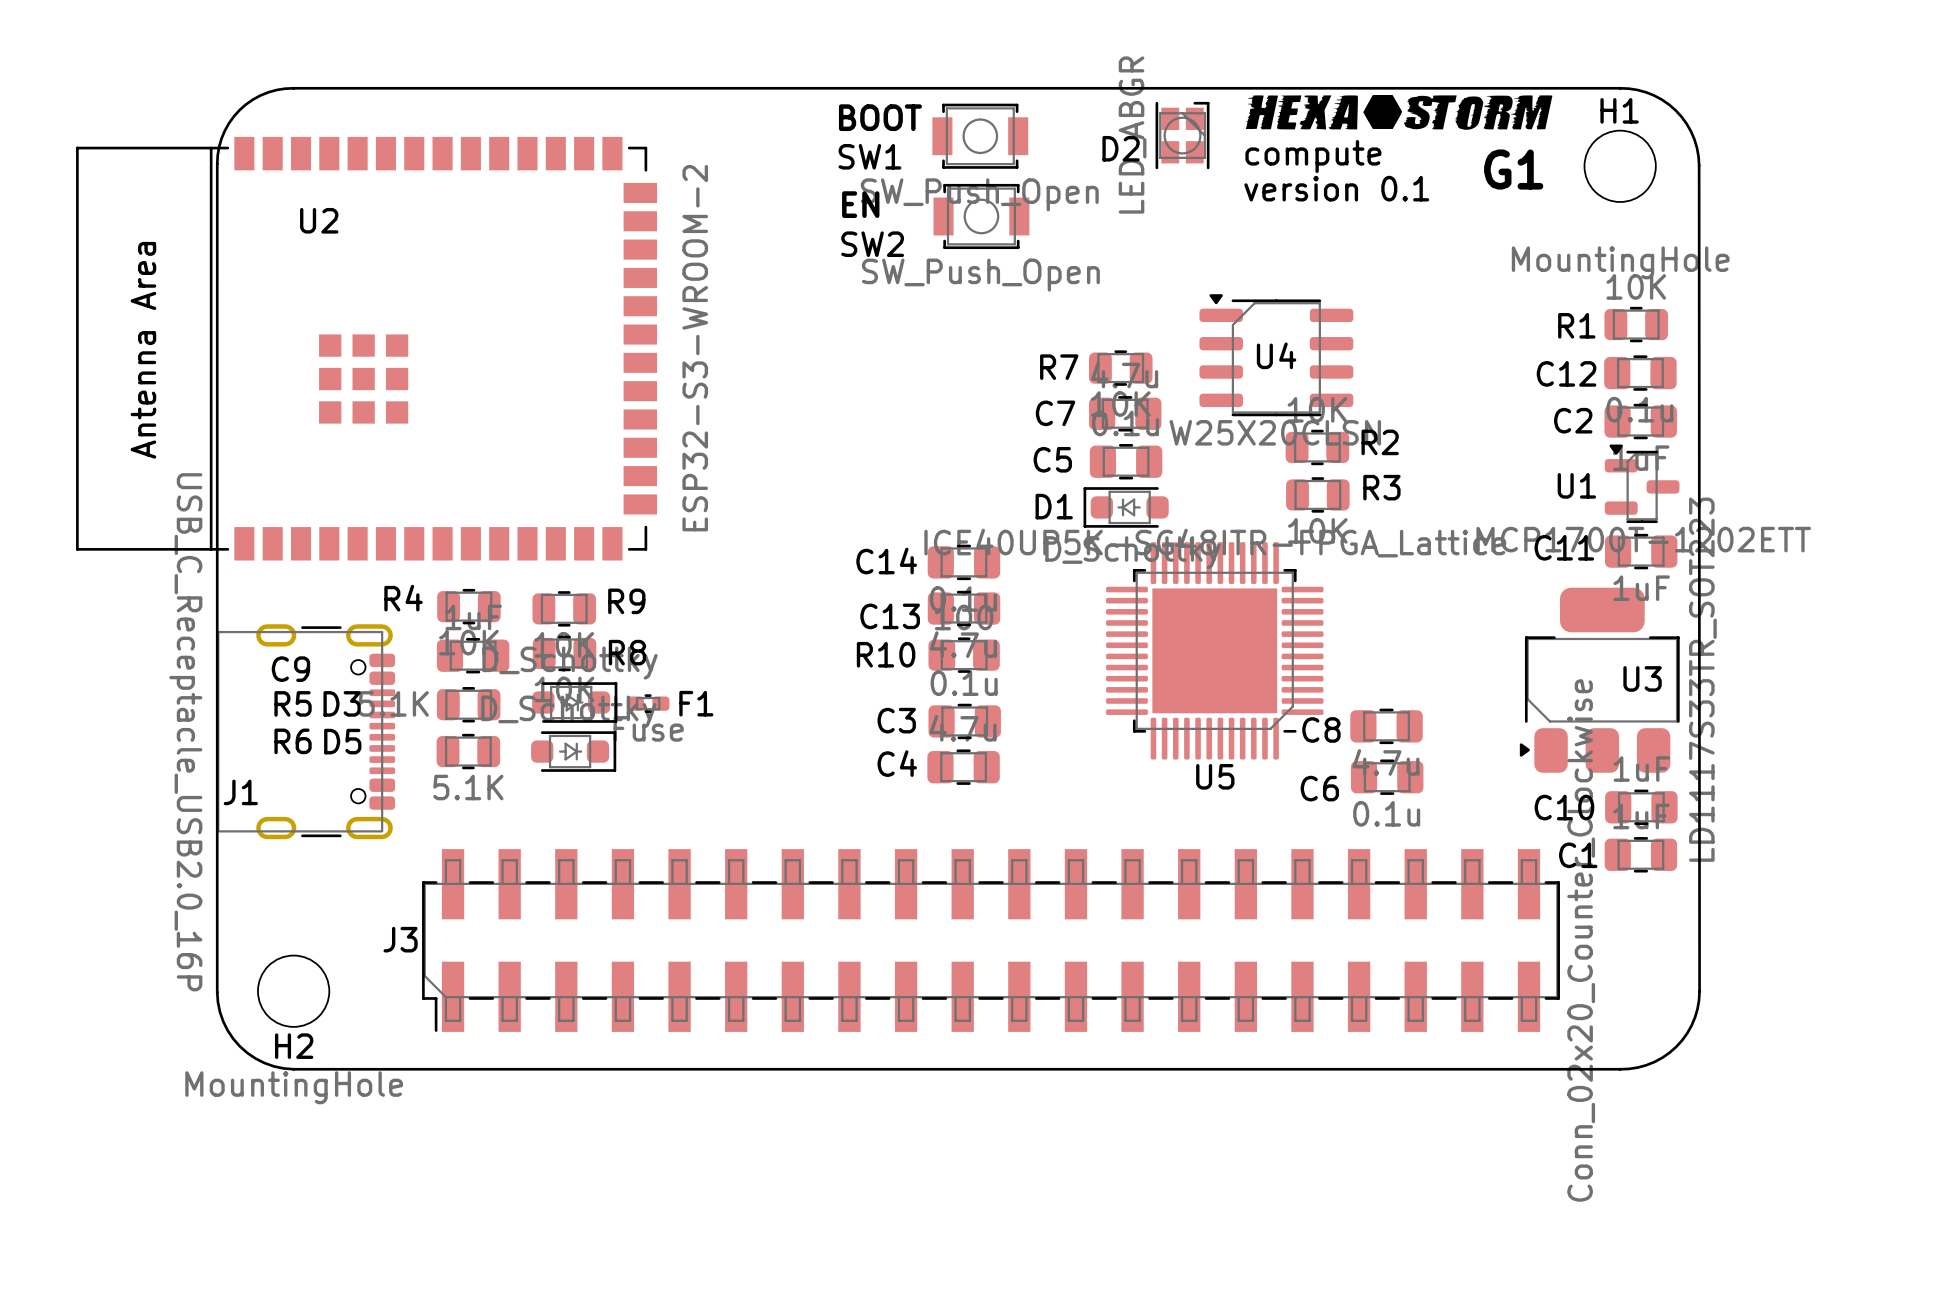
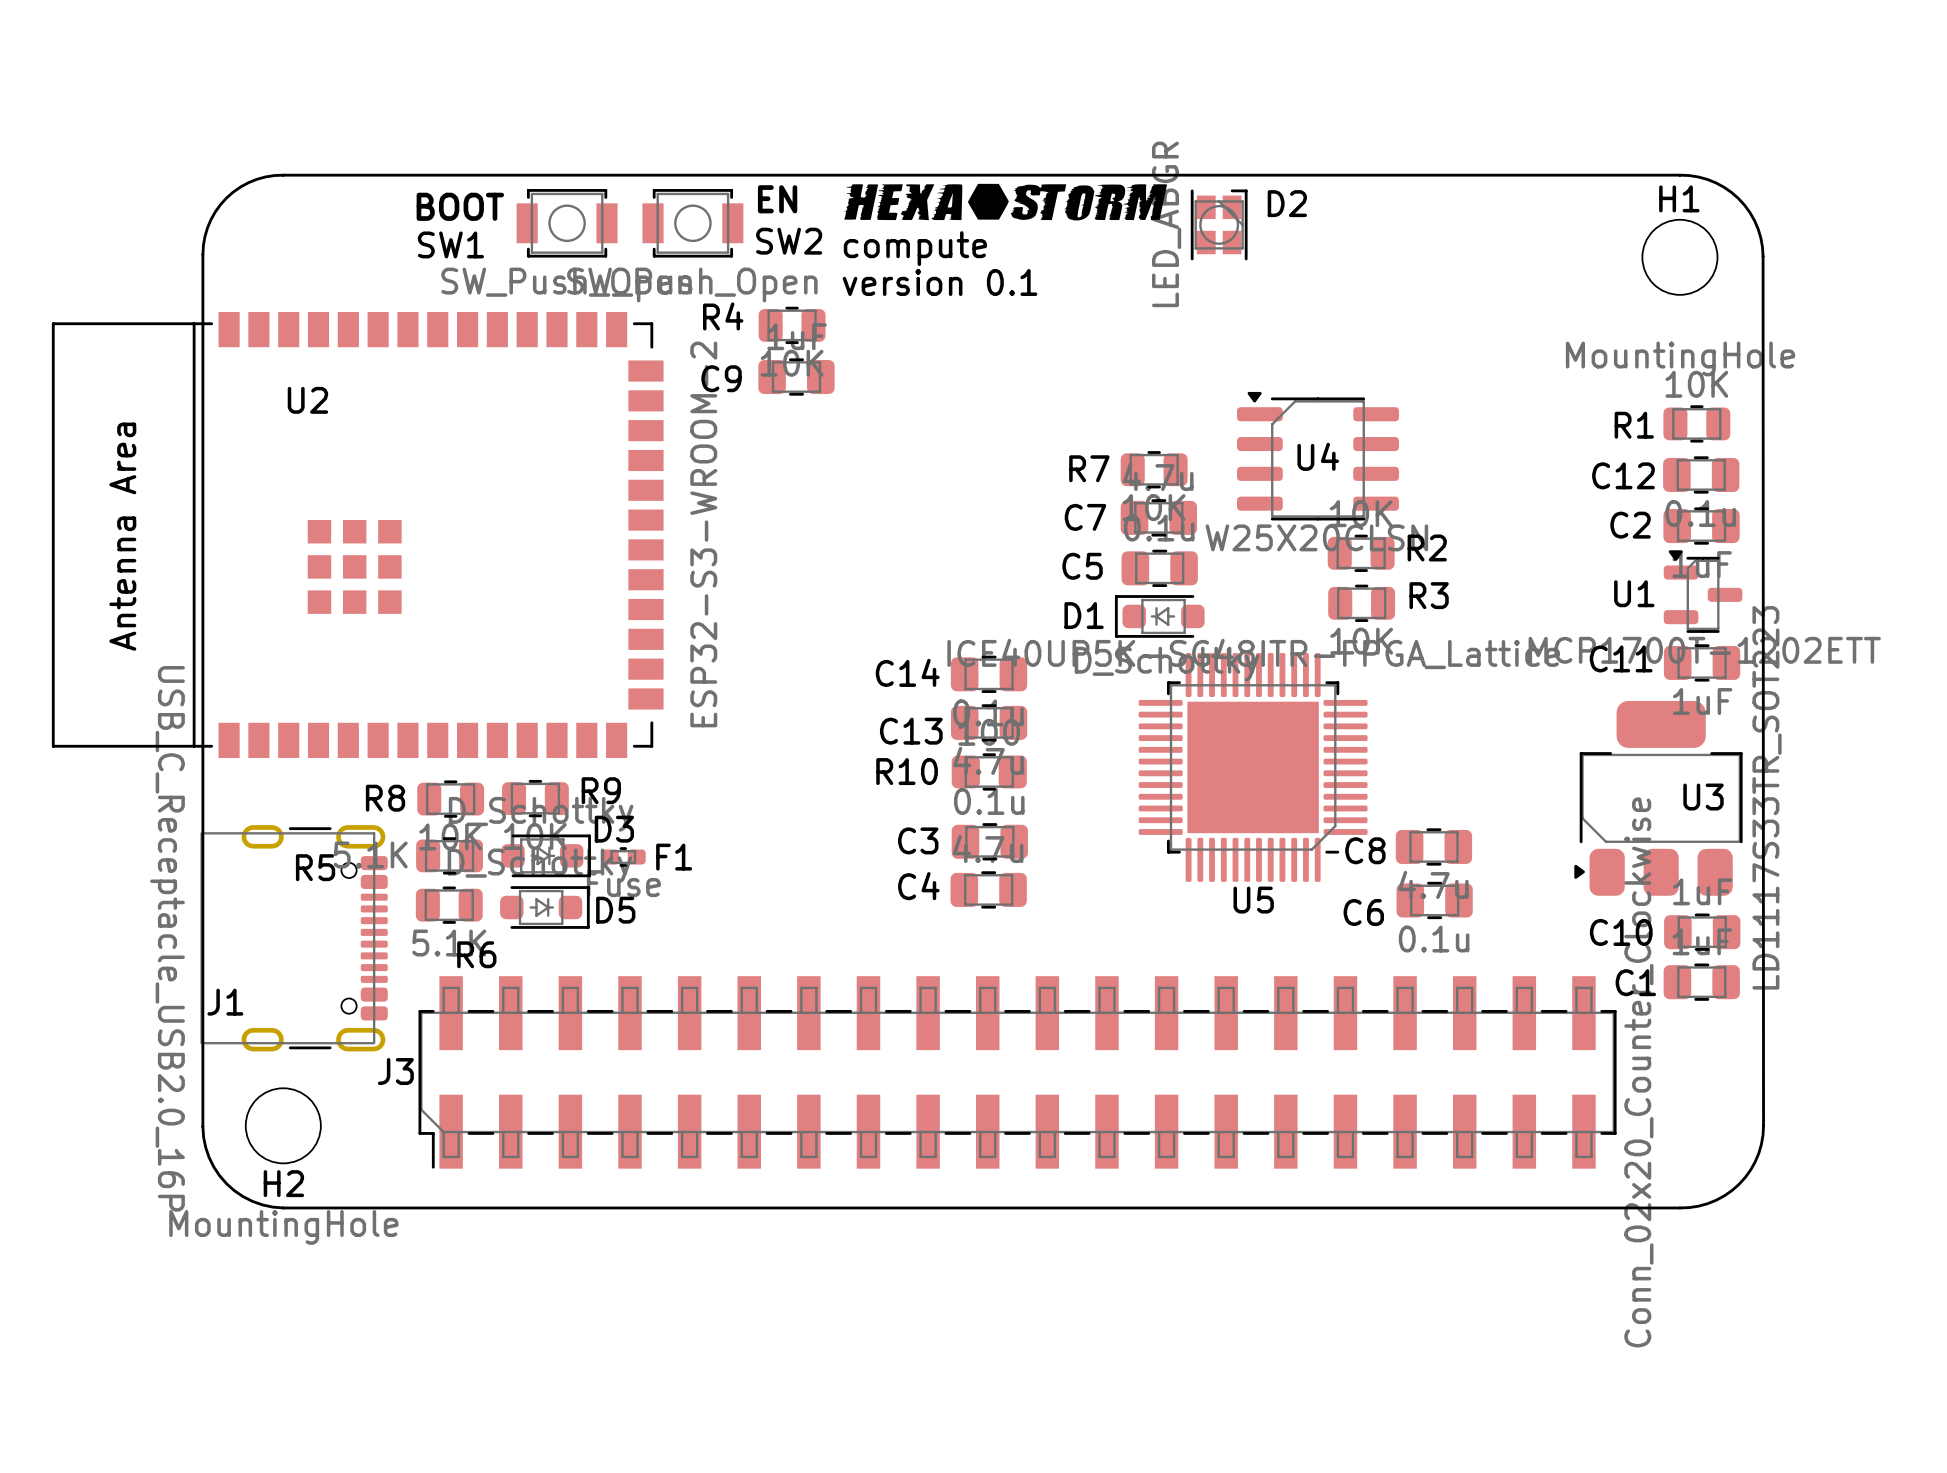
drawing: none -> [843, 183, 1168, 221]
G1: (1398, 112) -> none
text position: BOOT (880, 117) -> BOOT (460, 206)
SW1 position: (980, 136) -> (567, 223)
D2 name position: D2 (1121, 148) -> D2 (1287, 203)
text position: compute (1313, 156) -> compute (915, 248)
text position: version 0.1 (1336, 188) -> version 0.1 (940, 282)
text position: EN (860, 204) -> EN (777, 199)
SW2 position: (981, 216) -> (692, 223)
SW2 name position: SW2 (872, 244) -> SW2 (789, 241)
U2 position: (366, 348) -> (357, 535)
R4 position: (468, 606) -> (792, 325)
R9 position: (564, 608) -> (535, 798)
R8 name position: R8 (627, 652) -> R8 (385, 798)
R8 position: (564, 653) -> (450, 799)
C9 position: (473, 655) -> (796, 377)
C9 name position: C9 (290, 669) -> C9 (721, 378)
D3 position: (574, 702) -> (546, 855)
R5 name position: R5 (293, 703) -> R5 (315, 867)
D3 name position: D3 (342, 703) -> D3 (614, 829)
F1 position: (648, 703) -> (623, 857)
R5 position: (468, 704) -> (449, 855)
J1 position: (306, 731) -> (294, 938)
R6 name position: R6 (293, 741) -> R6 (476, 954)
D5 name position: D5 (342, 741) -> D5 (615, 910)
R6 position: (468, 751) -> (449, 905)
D5 position: (573, 751) -> (544, 907)

